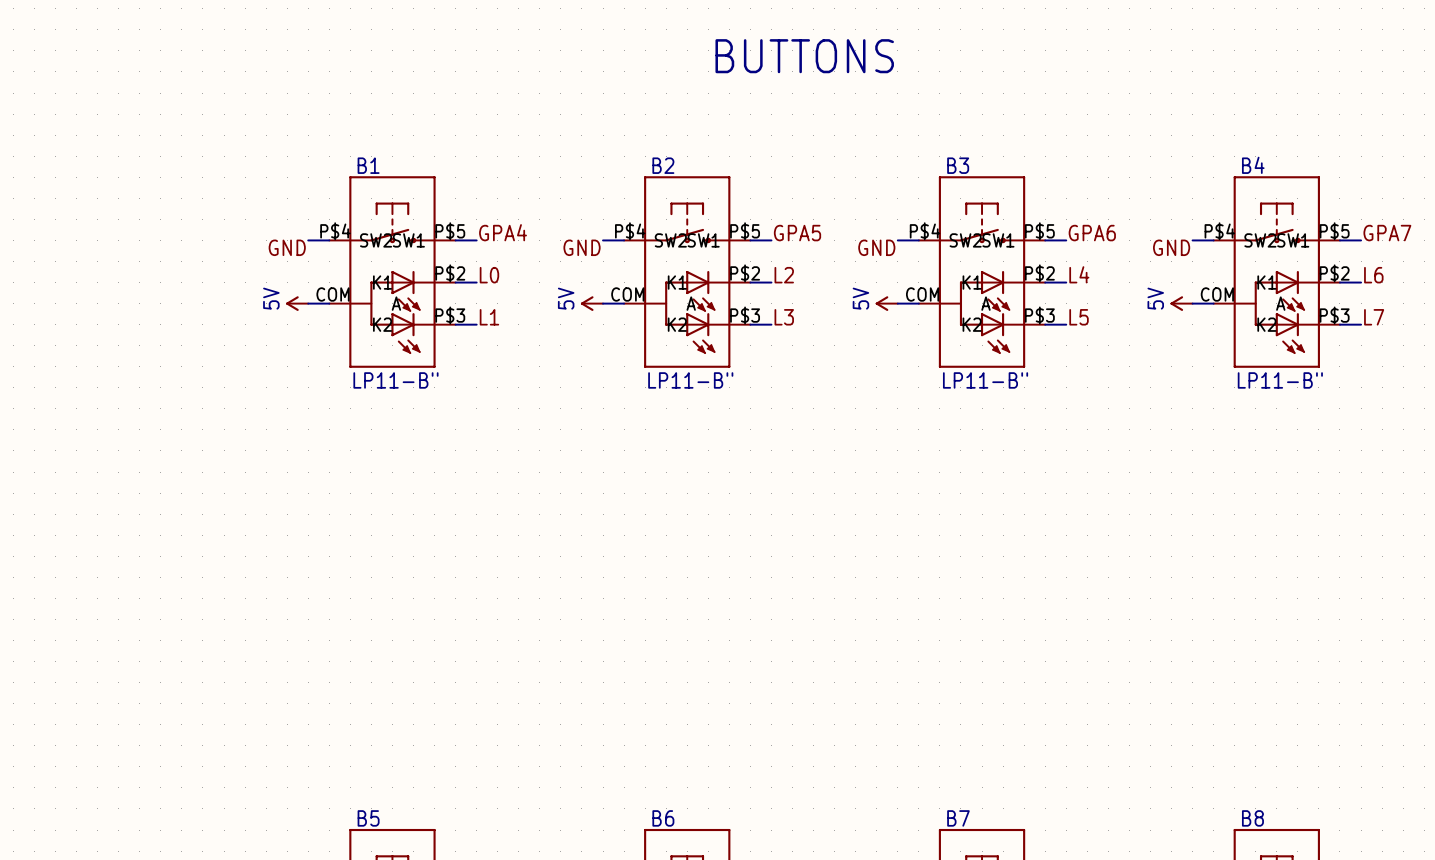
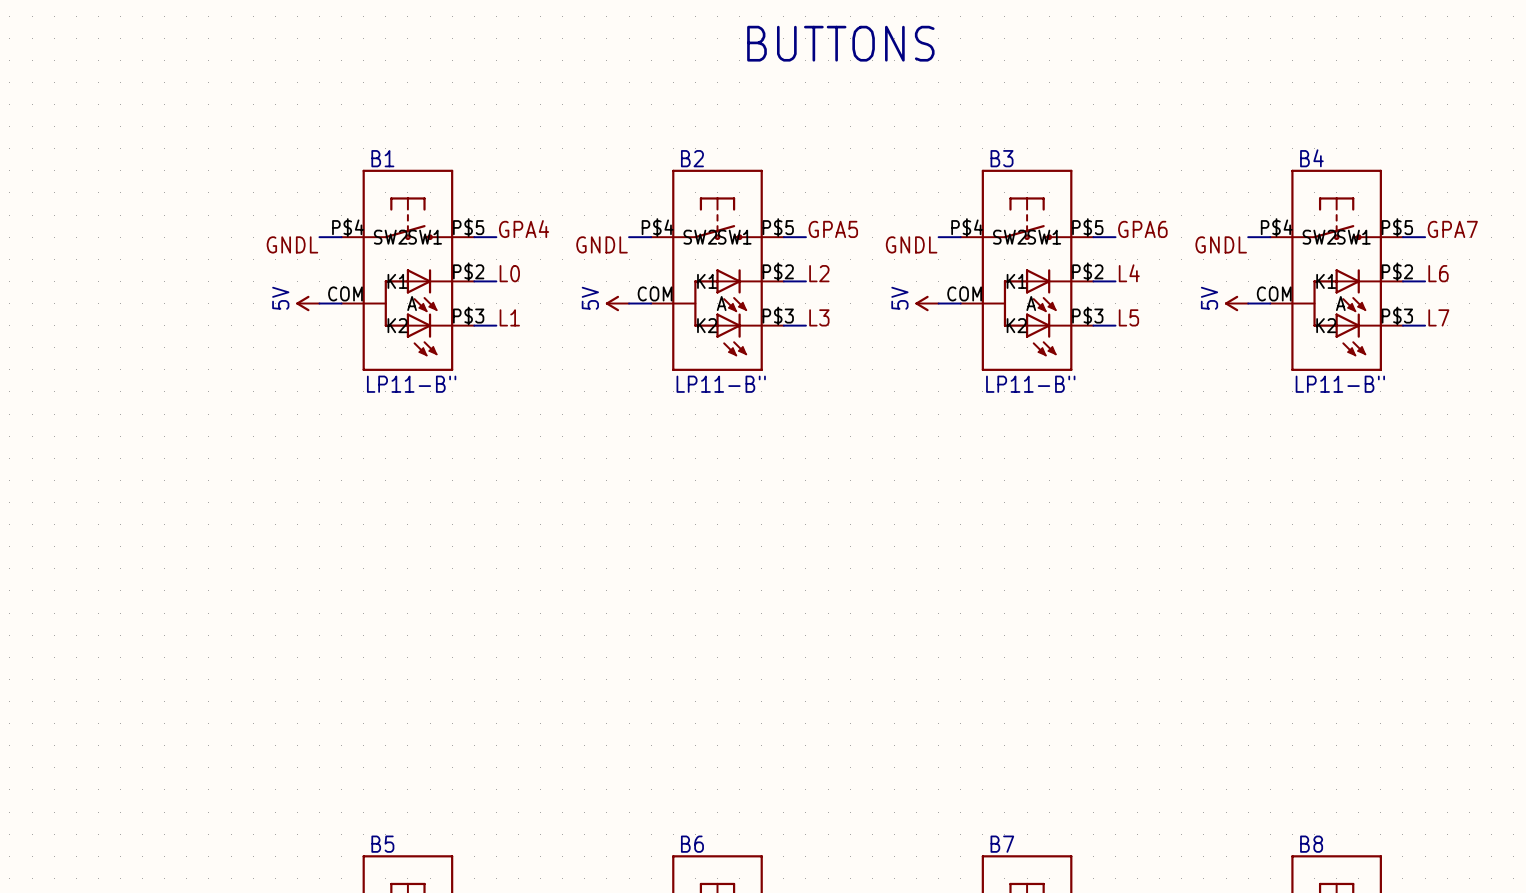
label: GND (287, 247) -> GNDL (292, 244)
label: GND (582, 247) -> GNDL (602, 244)
label: GND (876, 247) -> GNDL (911, 244)
label: GND (1171, 247) -> GNDL (1221, 244)

